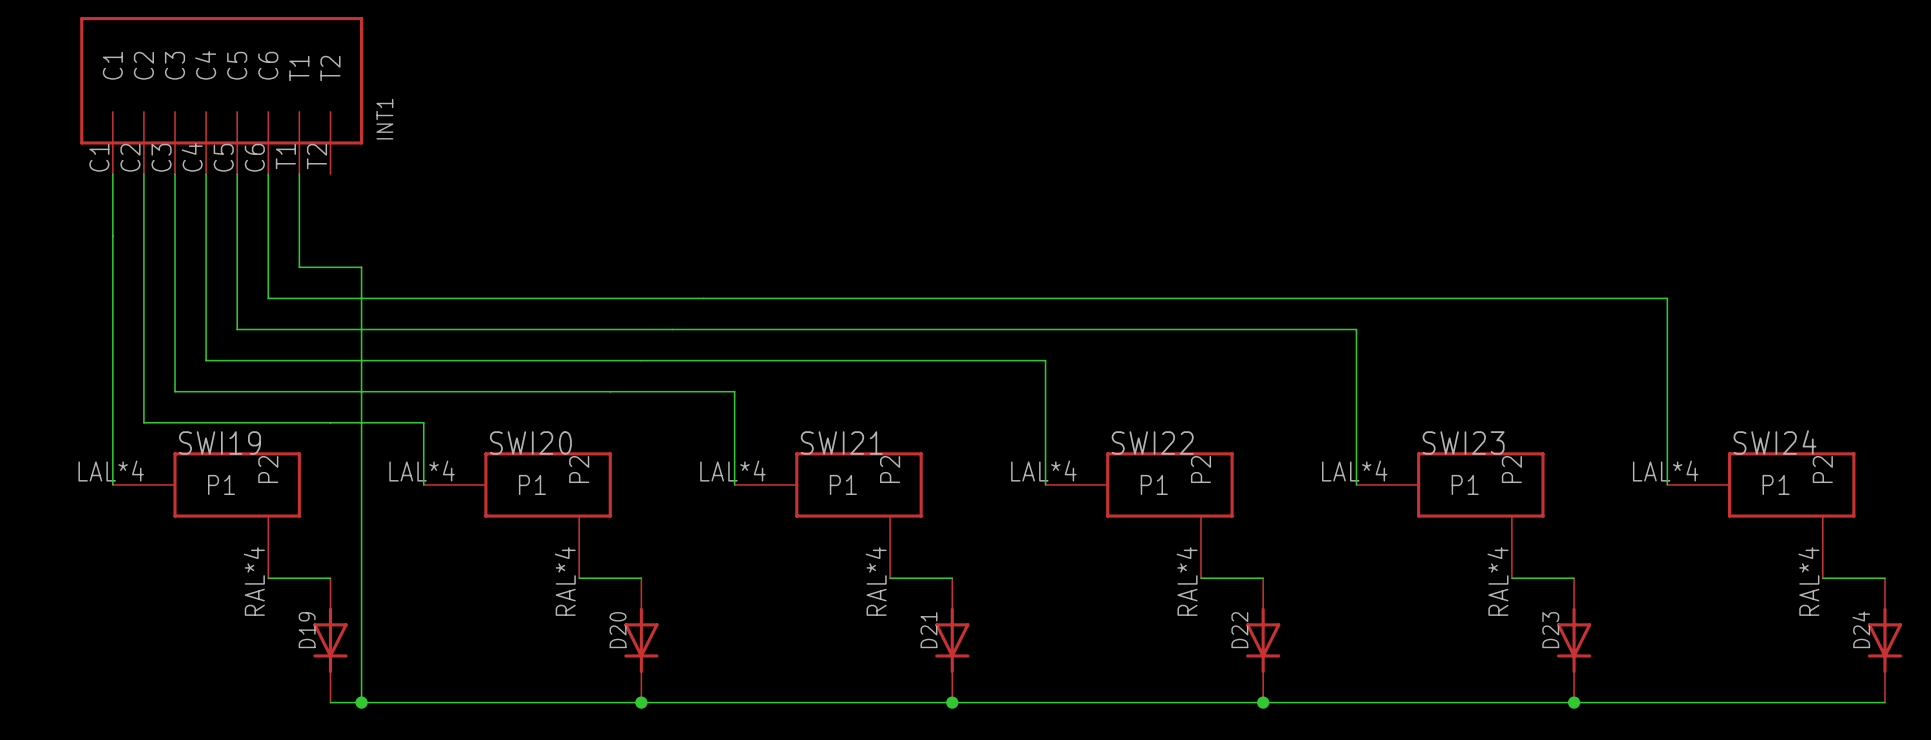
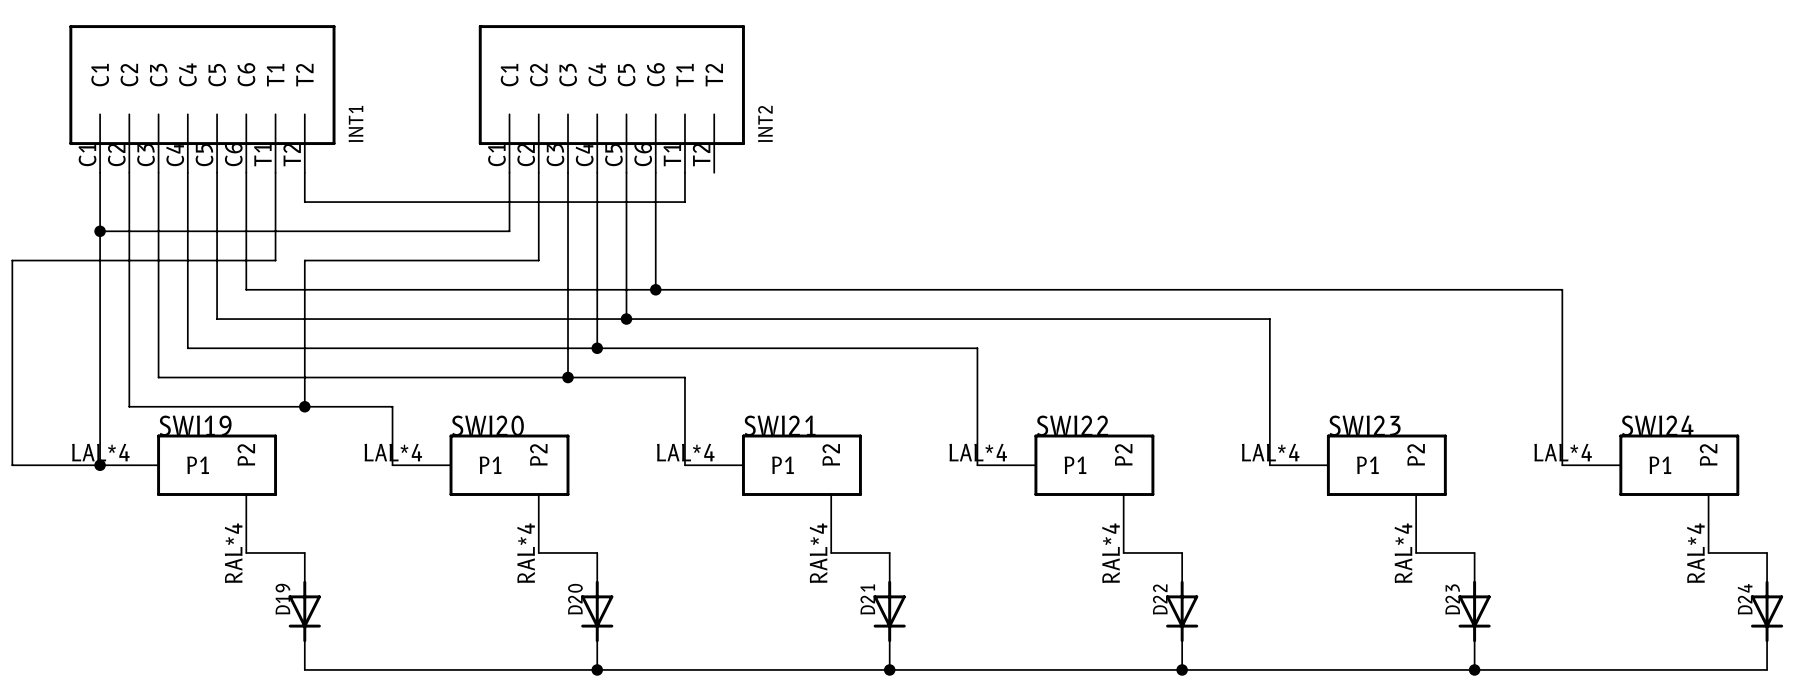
INT2: none -> (611, 98)
wire: none -> (304, 172) (304, 202) (684, 202) (684, 172)
wire: none -> (509, 172) (509, 231) (100, 231)
wire: none -> (568, 172) (568, 377)
wire: none -> (597, 172) (597, 348)
wire: none -> (626, 172) (626, 319)
wire: none -> (655, 172) (655, 289)
junction: none -> (100, 231)
wire: (299, 267) (330, 267) -> (304, 406) (304, 260)
wire: none -> (275, 260) (12, 260) (12, 465) (100, 465)
wire: (361, 267) (361, 702) -> (334, 260) (538, 260) (538, 172)
junction: none -> (655, 289)
junction: none -> (626, 319)
junction: none -> (597, 348)
junction: none -> (568, 377)
junction: none -> (304, 406)
junction: none -> (100, 465)
junction: (361, 702) -> none

